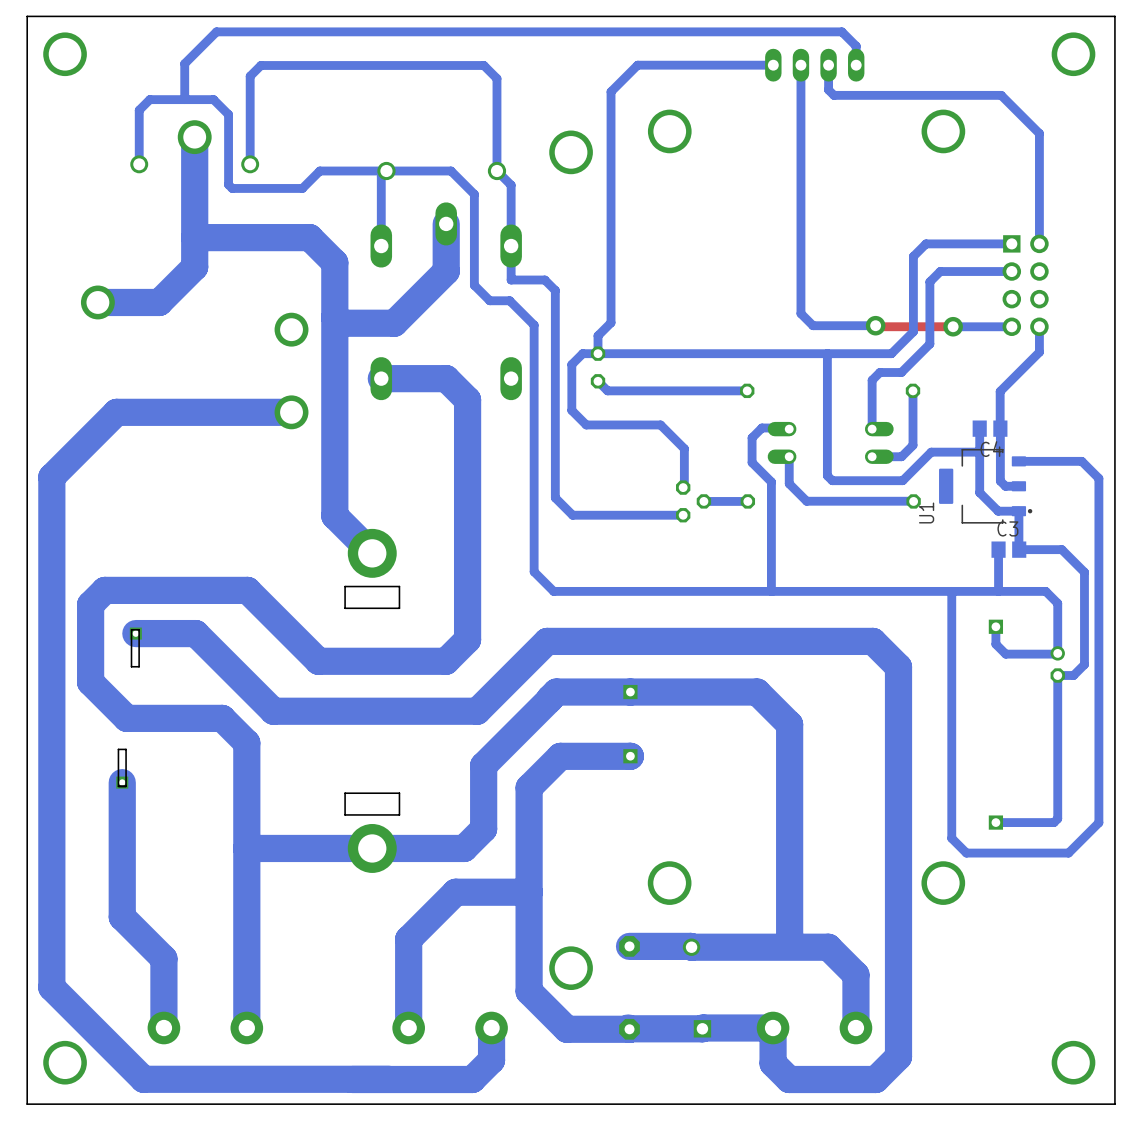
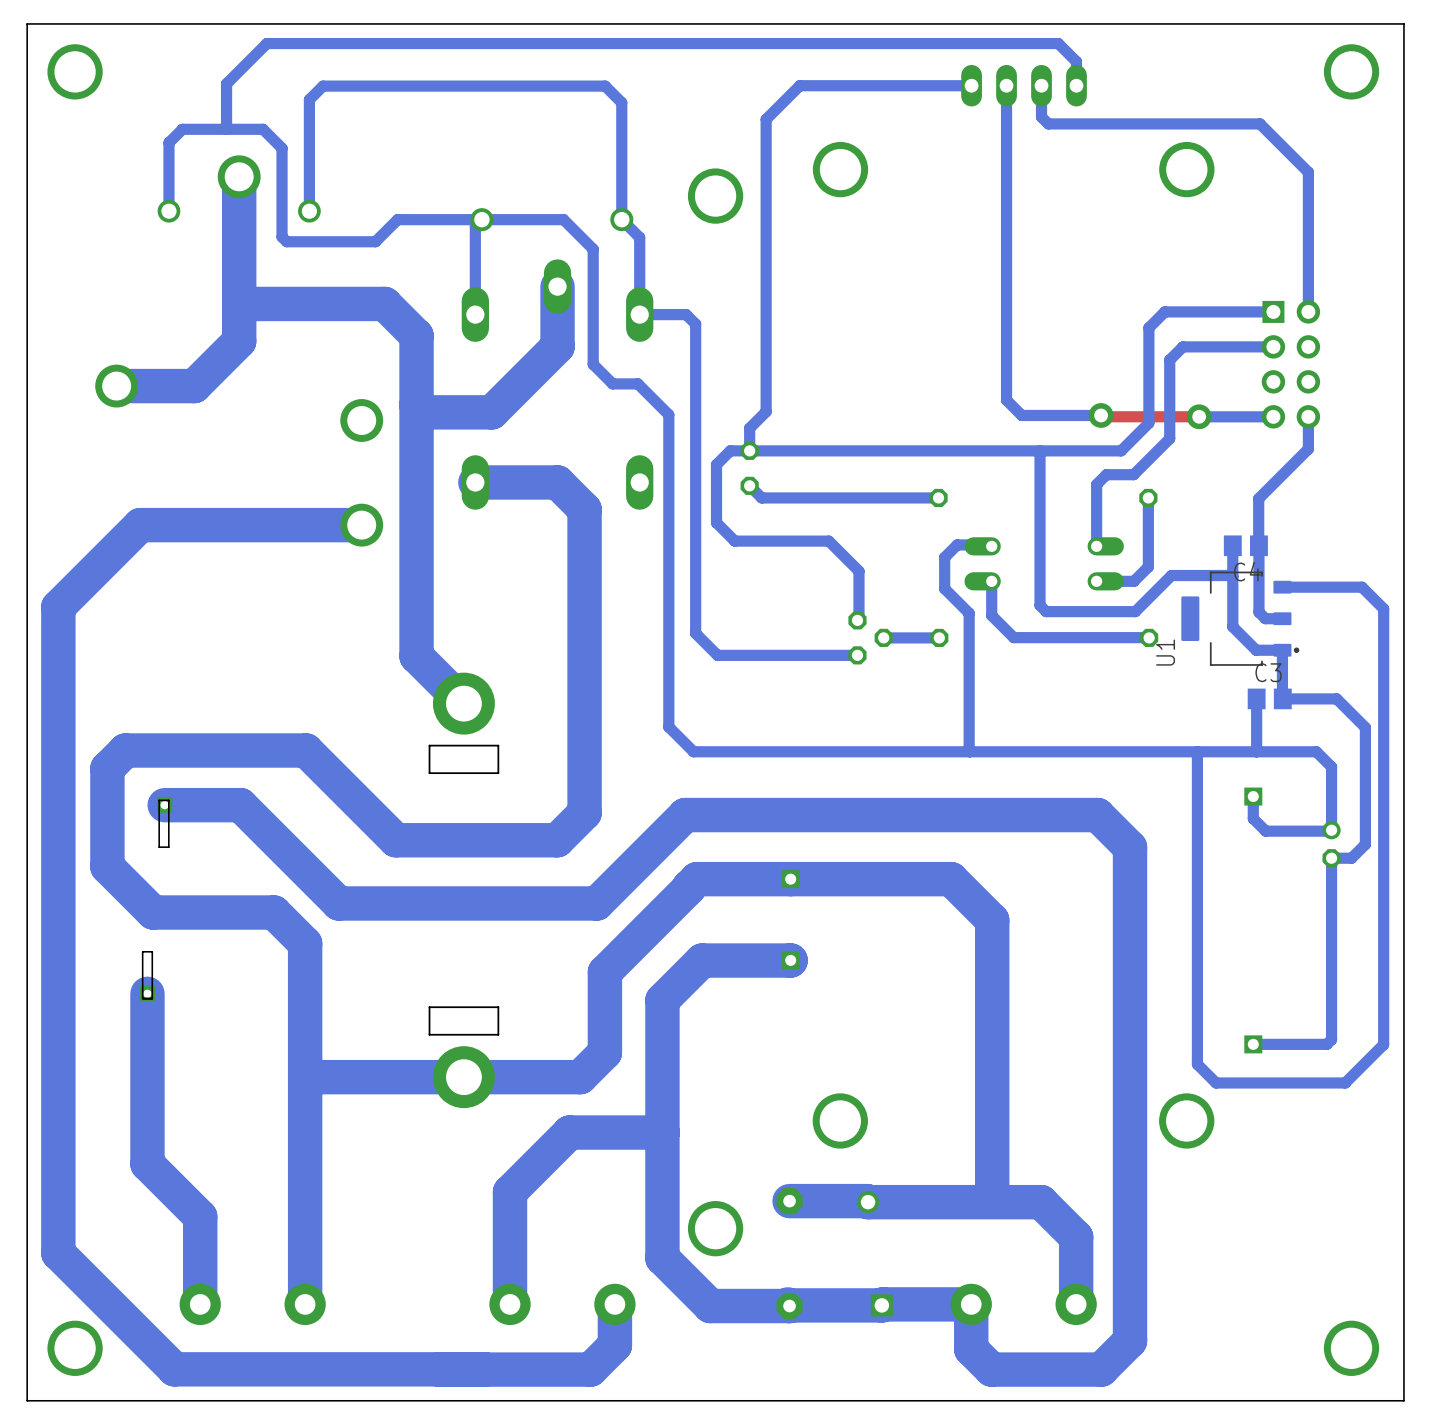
bottom track: (511, 246) (511, 280) (544, 280) (555, 290) -> (639, 314) (686, 314) (695, 324) (695, 370)

